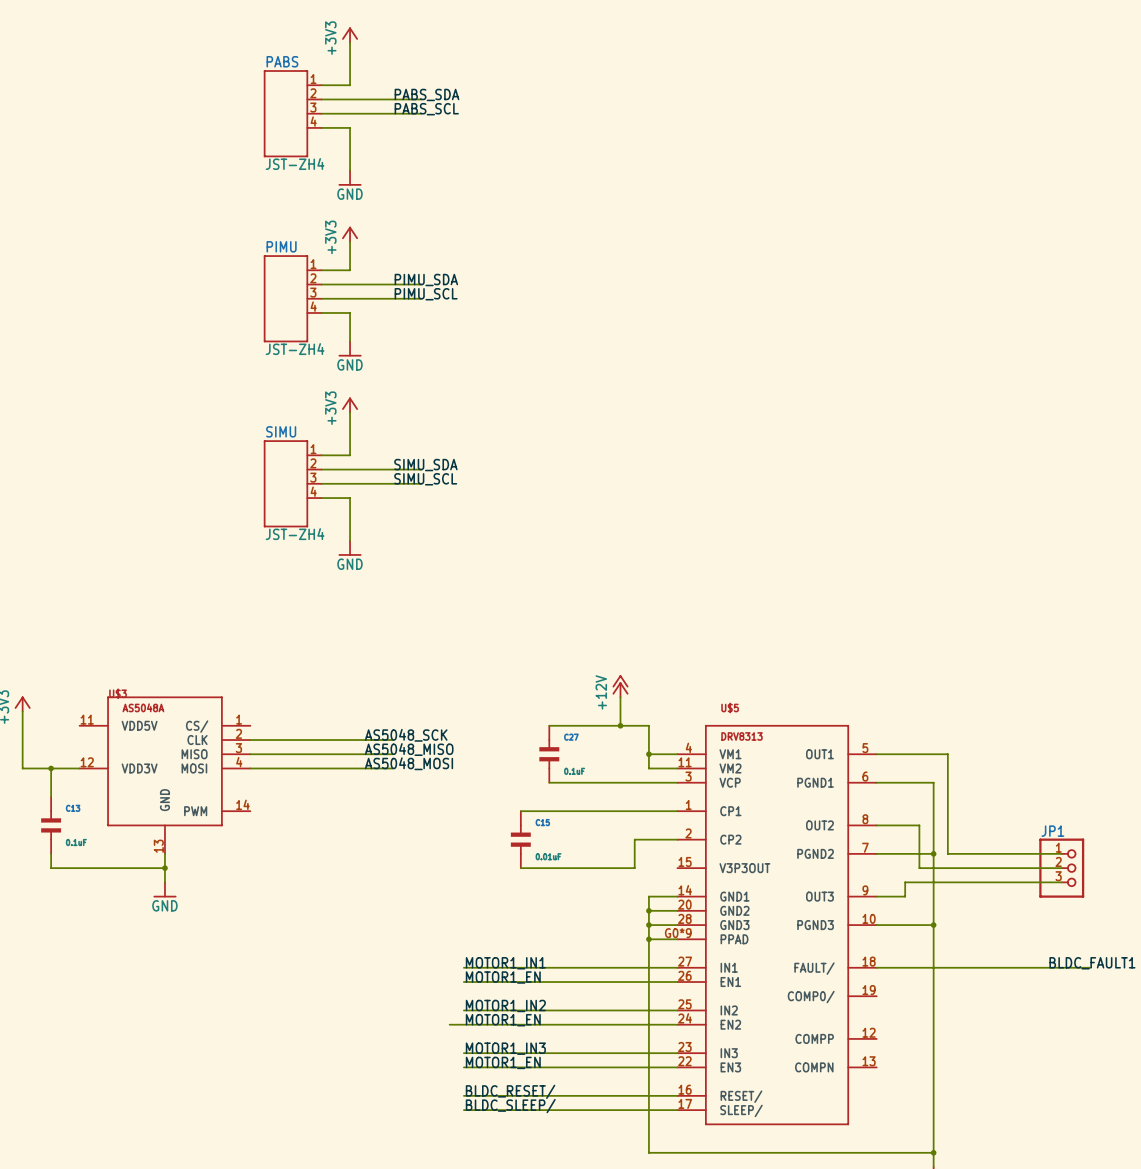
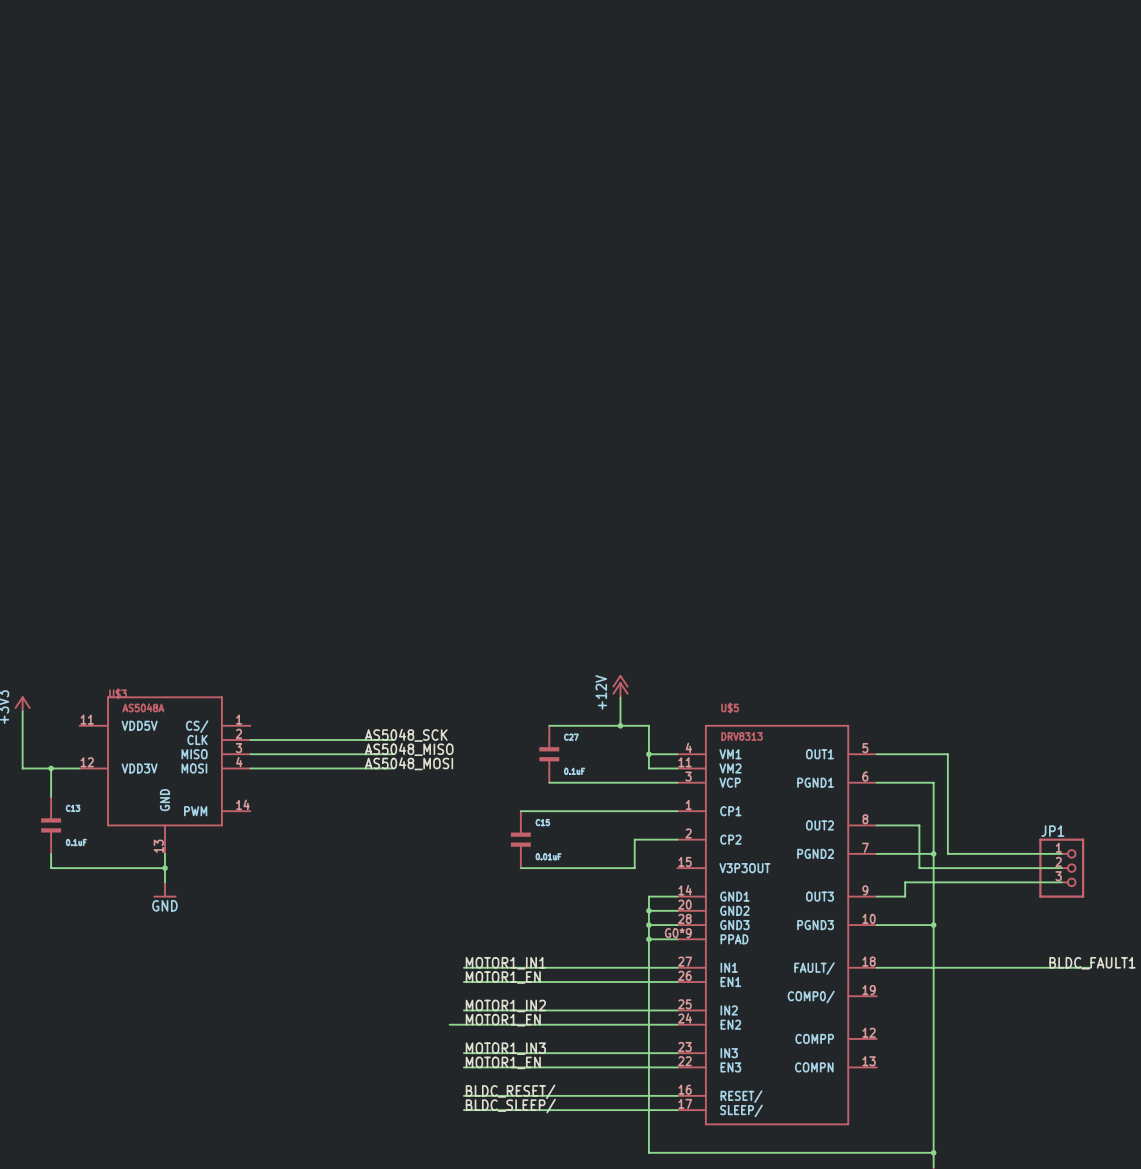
power symbol: +3V3 (350, 35) -> none
wire: (350, 42) (350, 85) (321, 85) -> none
label: PABS_SDA (426, 94) -> none
wire: (321, 99) (421, 99) -> none
label: PABS_SCL (426, 109) -> none
PABS: JST-ZH4 (292, 113) -> none
wire: (321, 113) (421, 113) -> none
wire: (321, 127) (350, 127) (350, 170) -> none
power symbol: GND (350, 178) -> none
power symbol: +3V3 (350, 234) -> none
wire: (350, 241) (350, 270) (321, 270) -> none
label: PIMU_SDA (426, 280) -> none
wire: (321, 284) (421, 284) -> none
label: PIMU_SCL (426, 294) -> none
PIMU: JST-ZH4 (292, 298) -> none
wire: (321, 298) (421, 298) -> none
wire: (321, 312) (350, 312) (350, 341) -> none
power symbol: GND (350, 348) -> none
power symbol: +3V3 (350, 405) -> none
wire: (350, 412) (350, 455) (321, 455) -> none
label: SIMU_SDA (425, 465) -> none
wire: (321, 469) (421, 469) -> none
label: SIMU_SCL (425, 479) -> none
SIMU: JST-ZH4 (292, 483) -> none
wire: (321, 483) (421, 483) -> none
wire: (321, 498) (350, 498) (350, 540) -> none
power symbol: GND (350, 548) -> none

